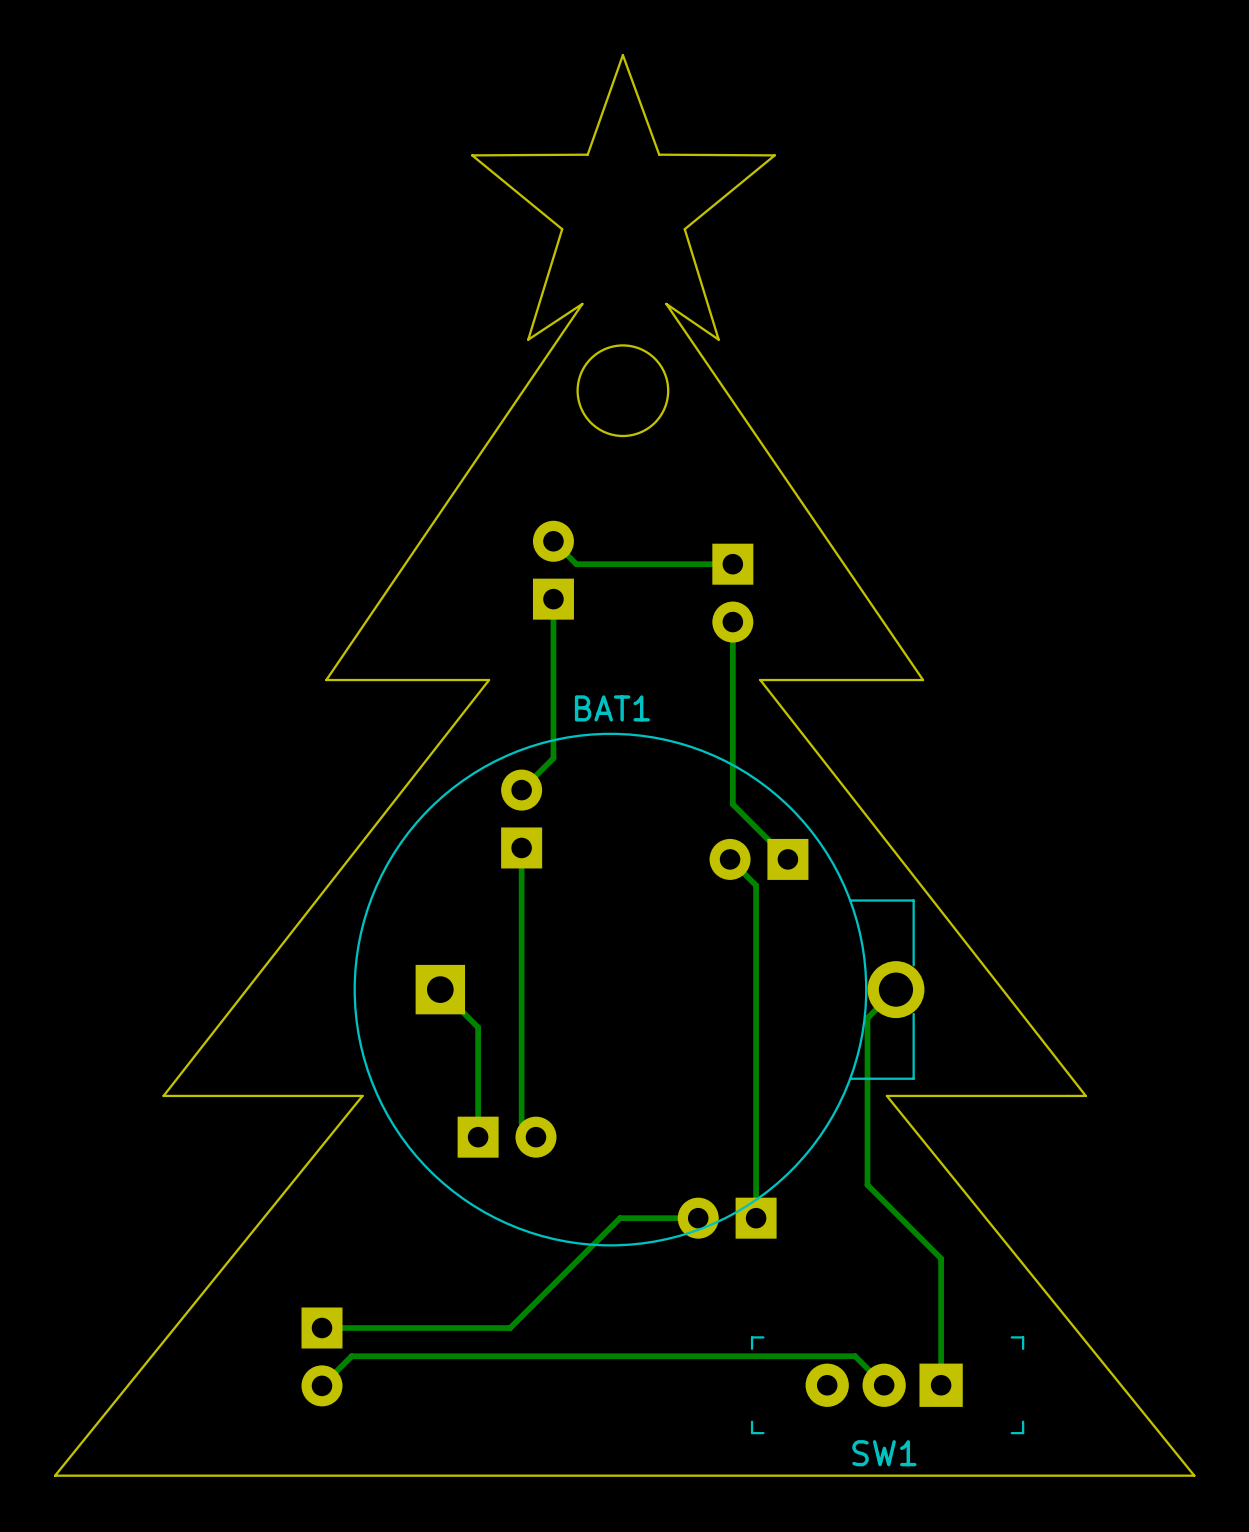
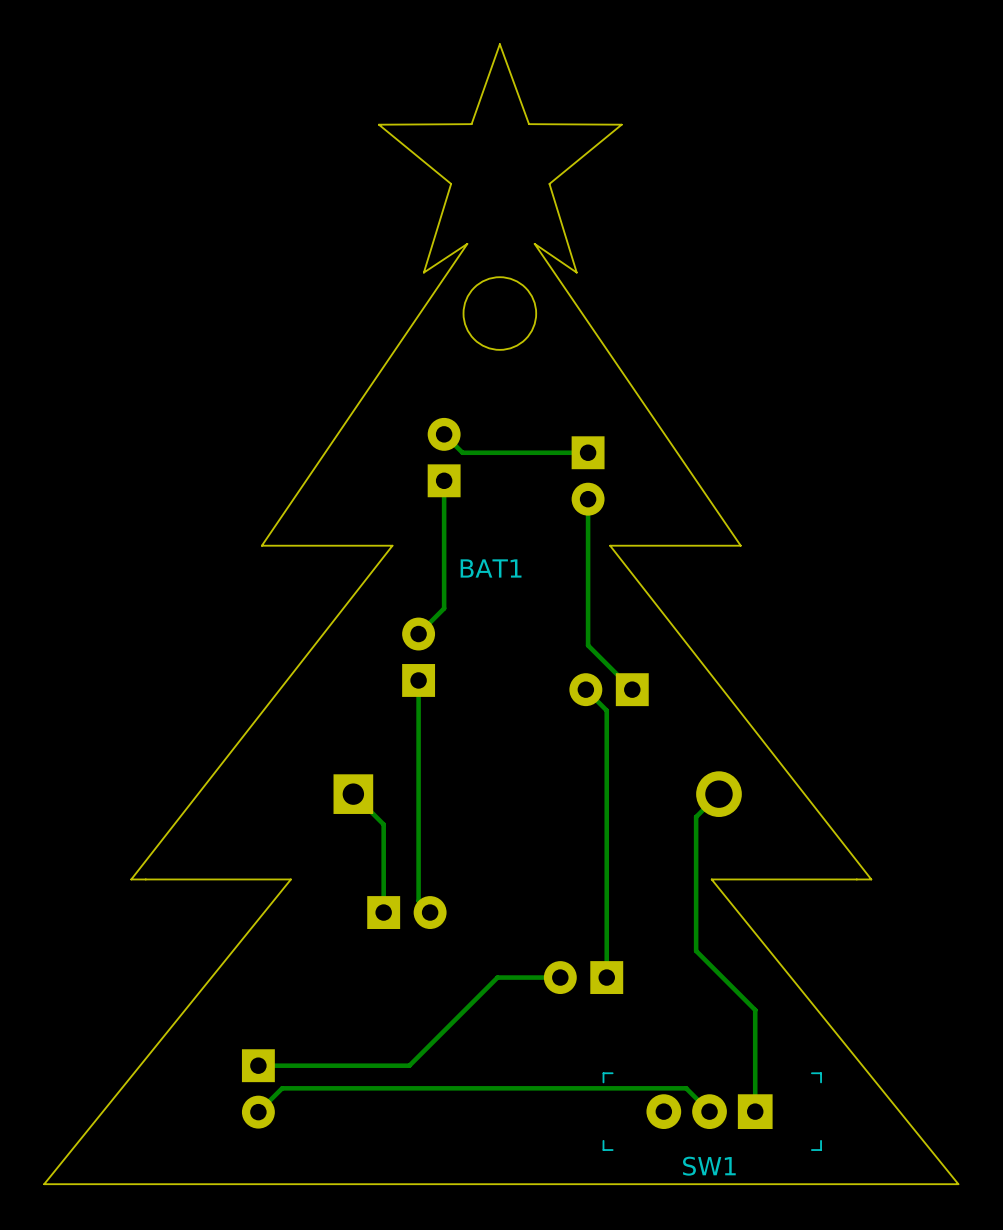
BAT1 footprint: [353, 732, 925, 1247] -> [333, 771, 742, 817]

